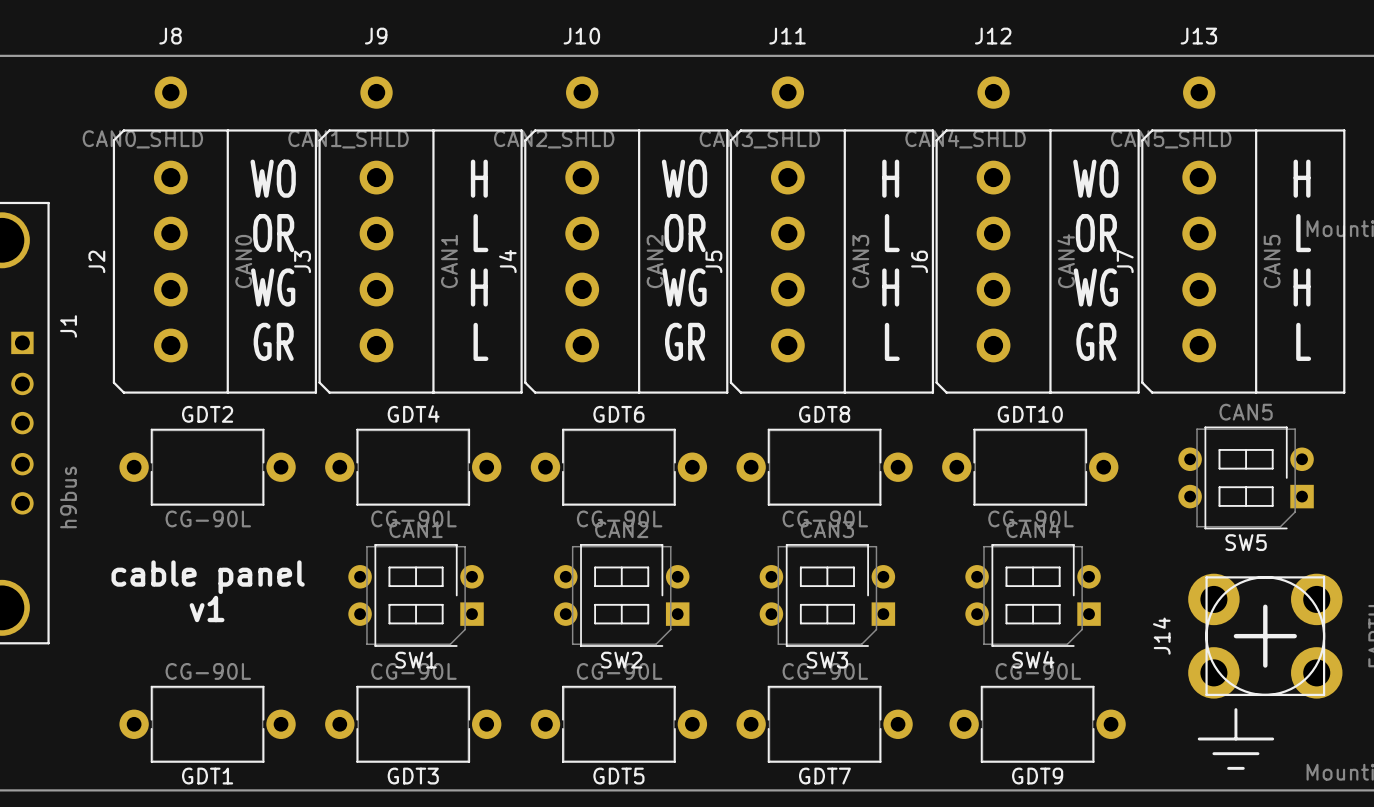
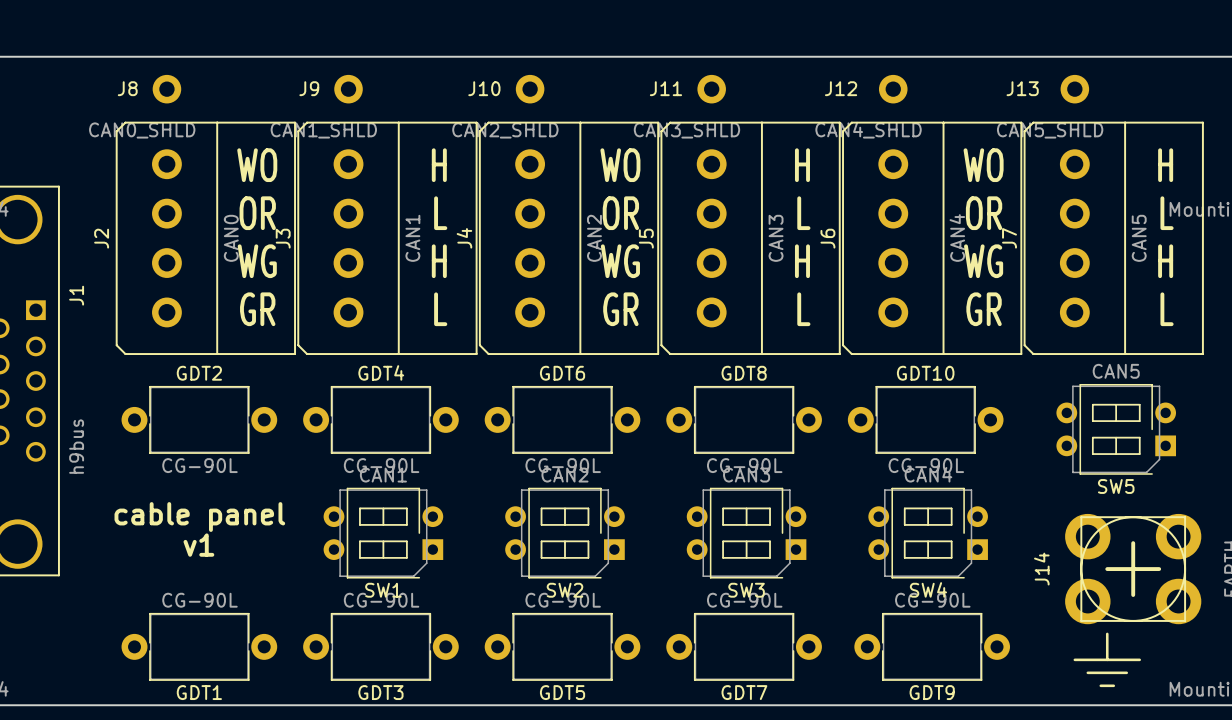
J8 name position: J8 (170, 36) -> J8 (127, 88)
J9 name position: J9 (376, 36) -> J9 (309, 88)
J10 name position: J10 (581, 36) -> J10 (484, 88)
J11 name position: J11 (787, 36) -> J11 (665, 88)
J12 name position: J12 (993, 36) -> J12 (841, 88)
J13 name position: J13 (1198, 36) -> J13 (1022, 88)

